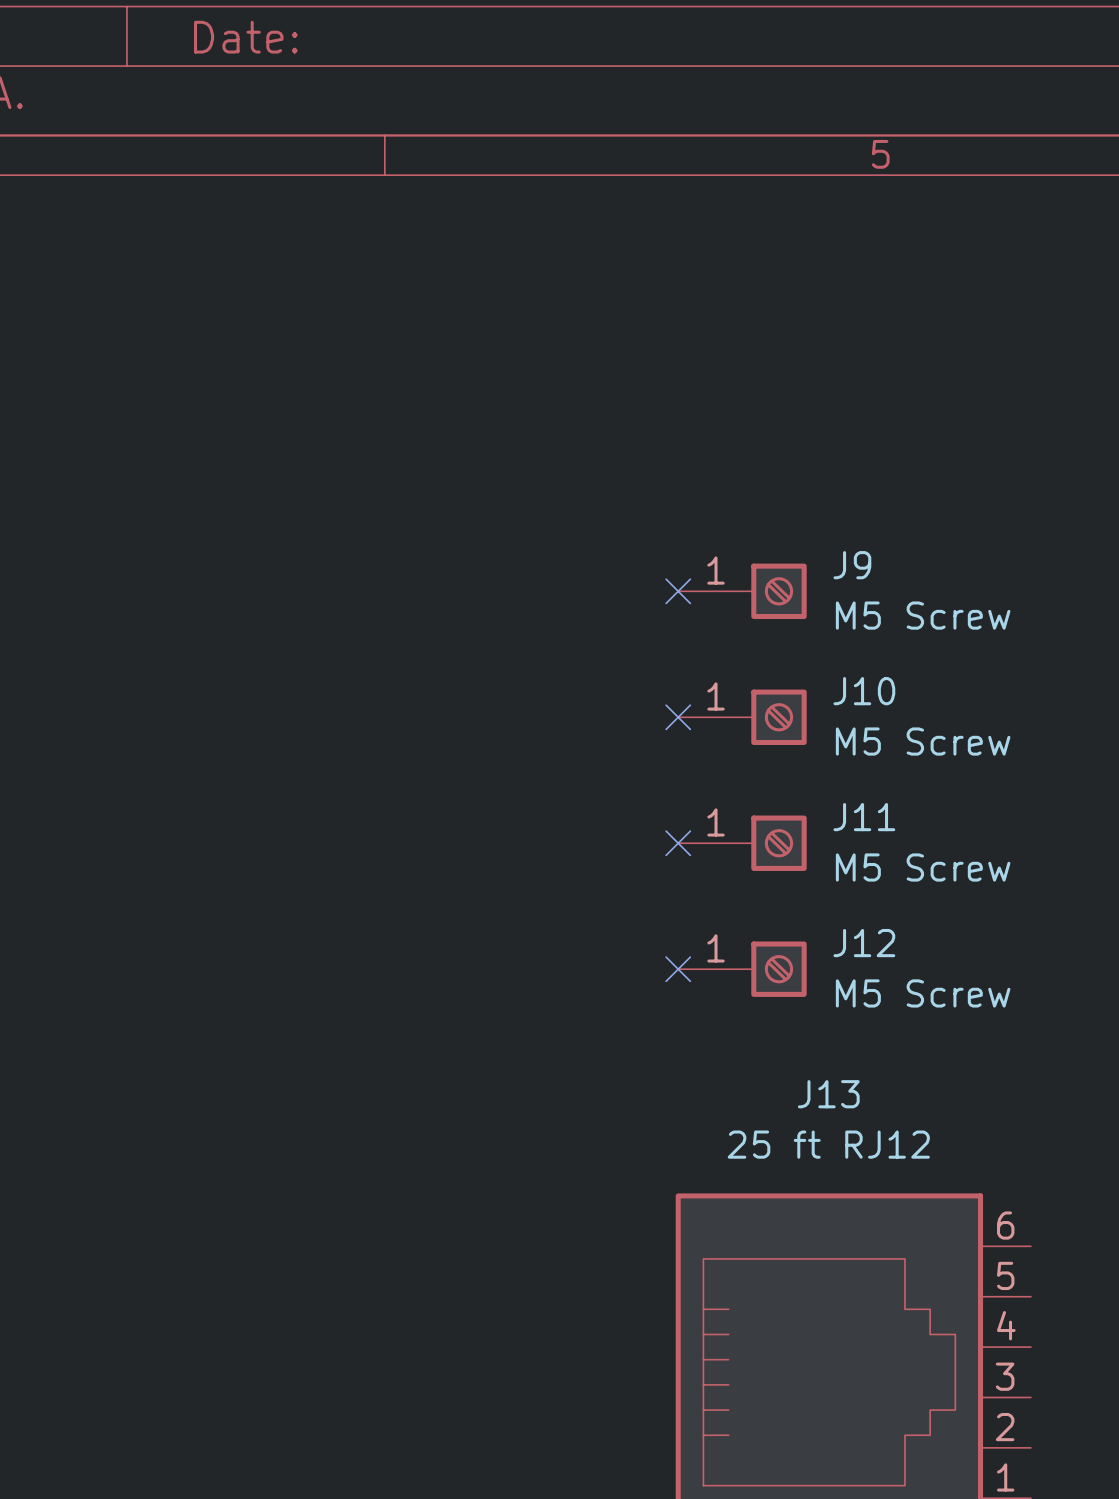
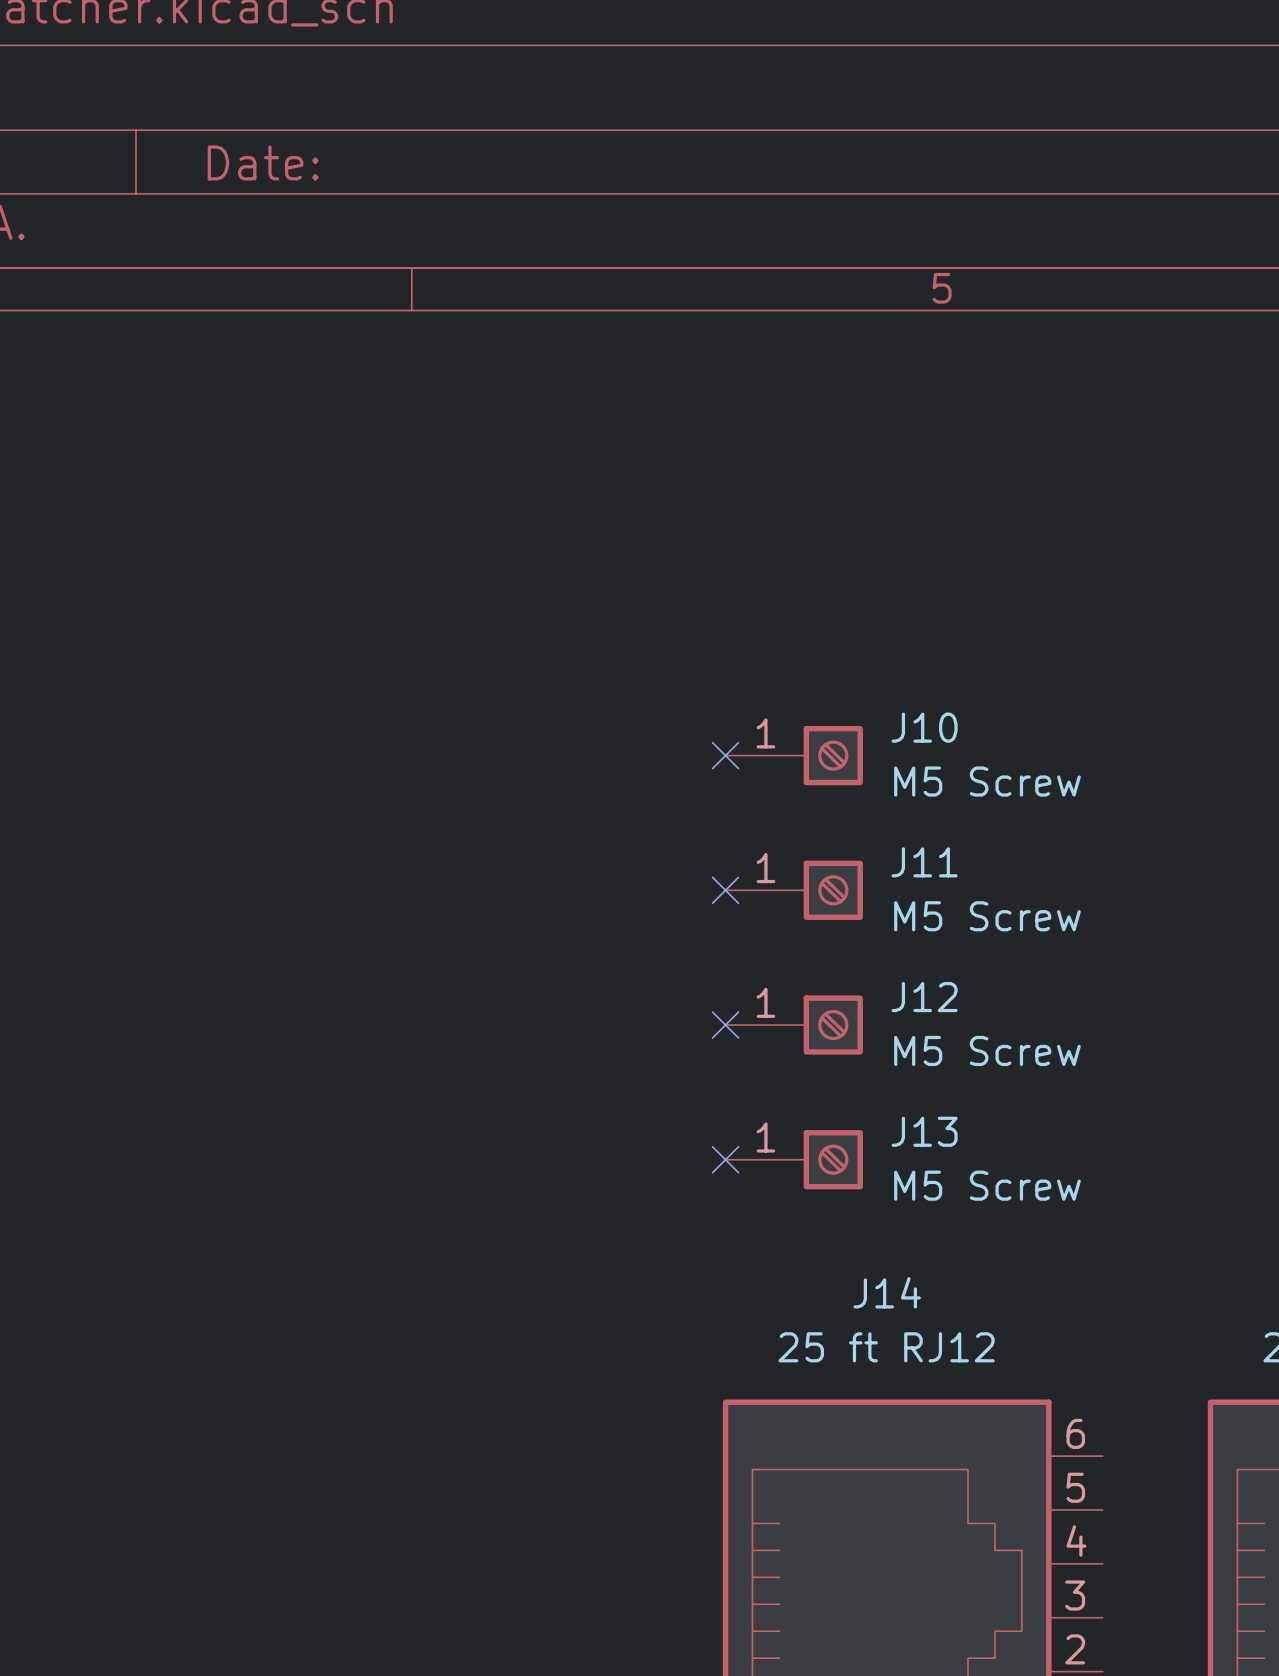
J9 name: J9 (852, 565) -> J10 (924, 727)
J10 name: J10 (864, 691) -> J11 (924, 862)
J11 name: J11 (864, 817) -> J12 (924, 997)
J12 name: J12 (864, 943) -> J13 (924, 1131)
J13 name: J13 (828, 1094) -> J14 (887, 1292)

